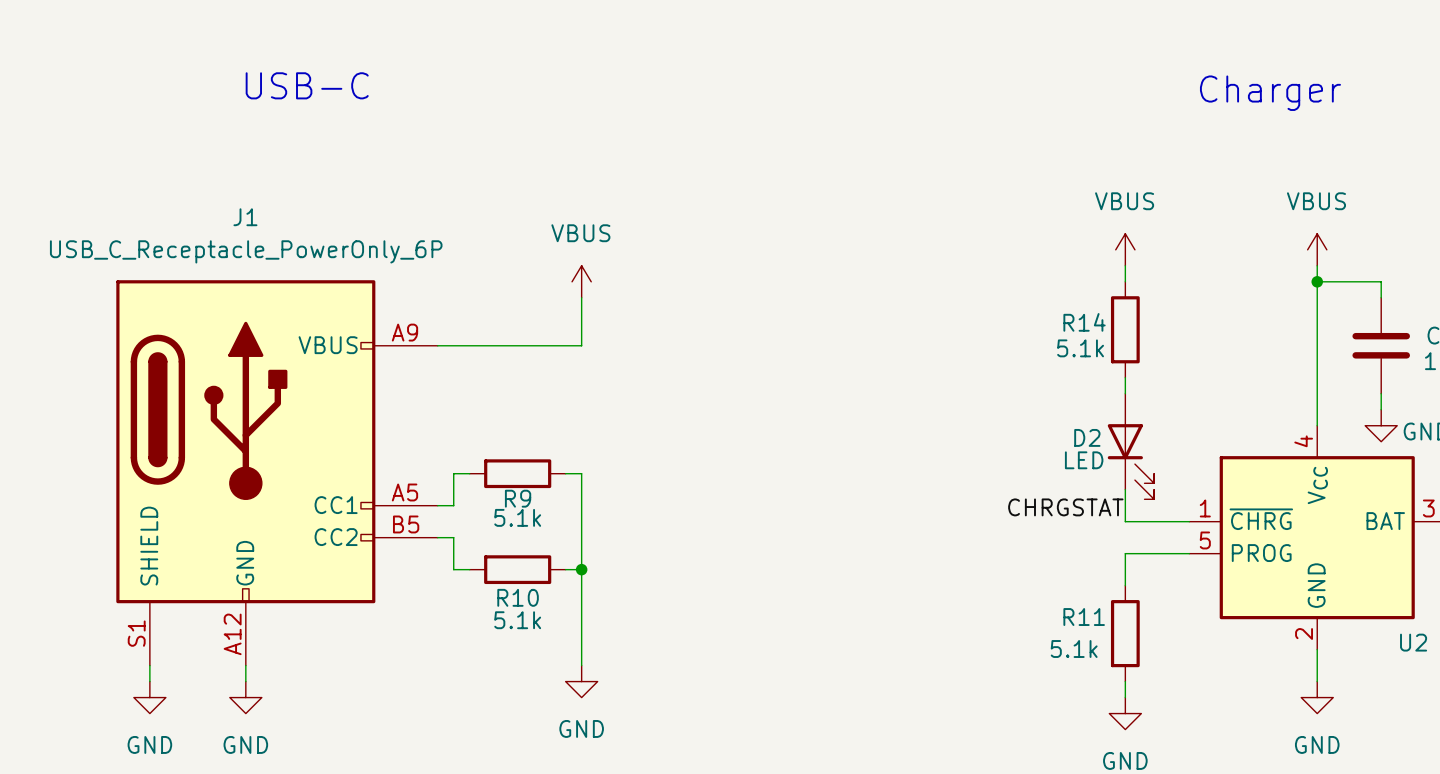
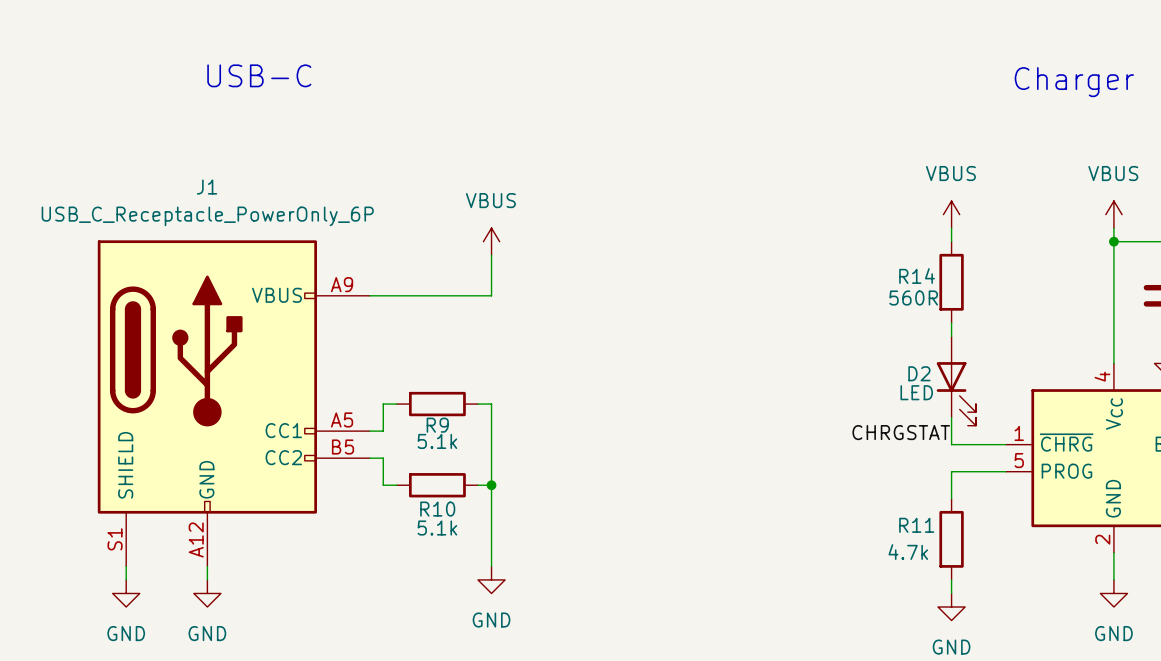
R14 value: 5.1k (1080, 348) -> 560R (913, 298)
R11 value: 5.1k (1074, 649) -> 4.7k (908, 552)

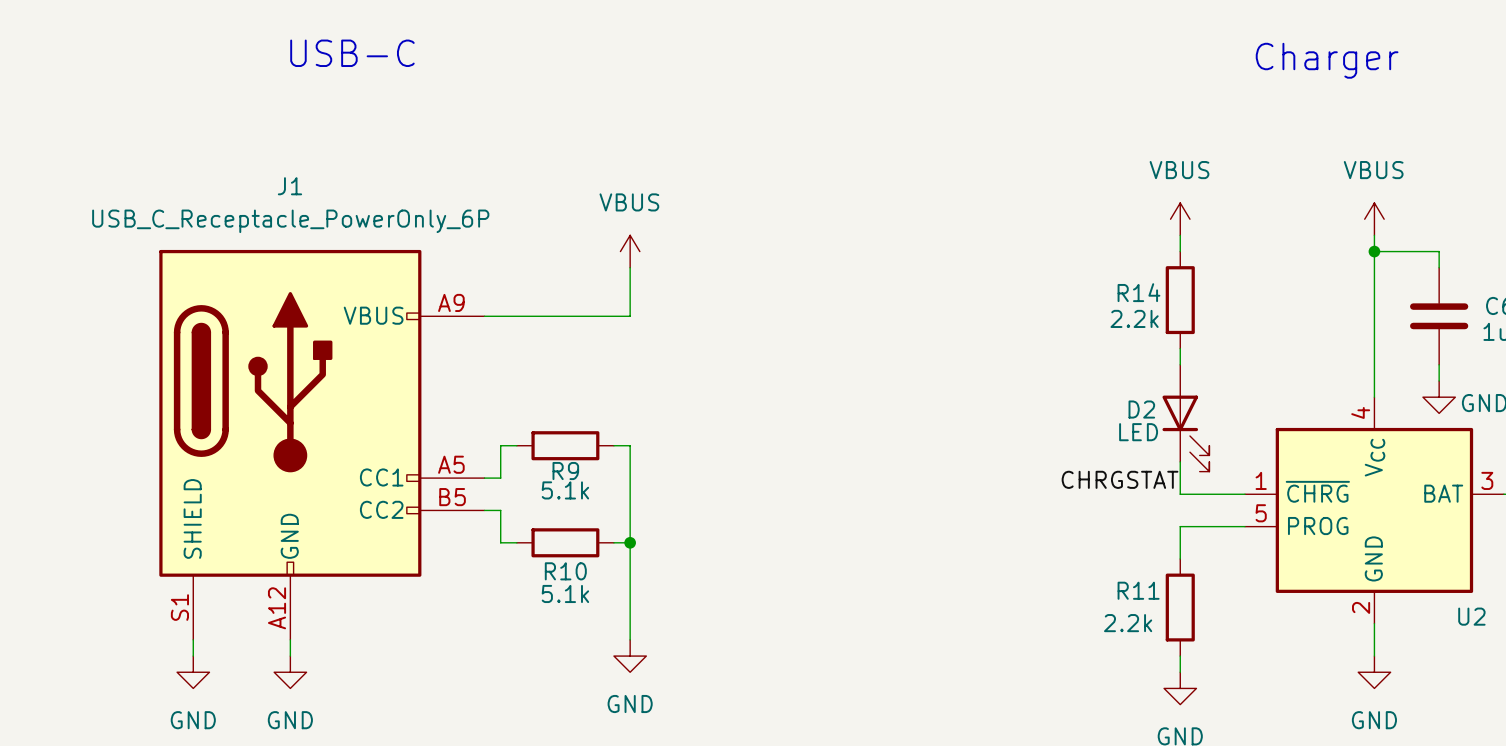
R14 value: 560R (913, 298) -> 2.2k (1134, 318)
R11 value: 4.7k (908, 552) -> 2.2k (1128, 623)

